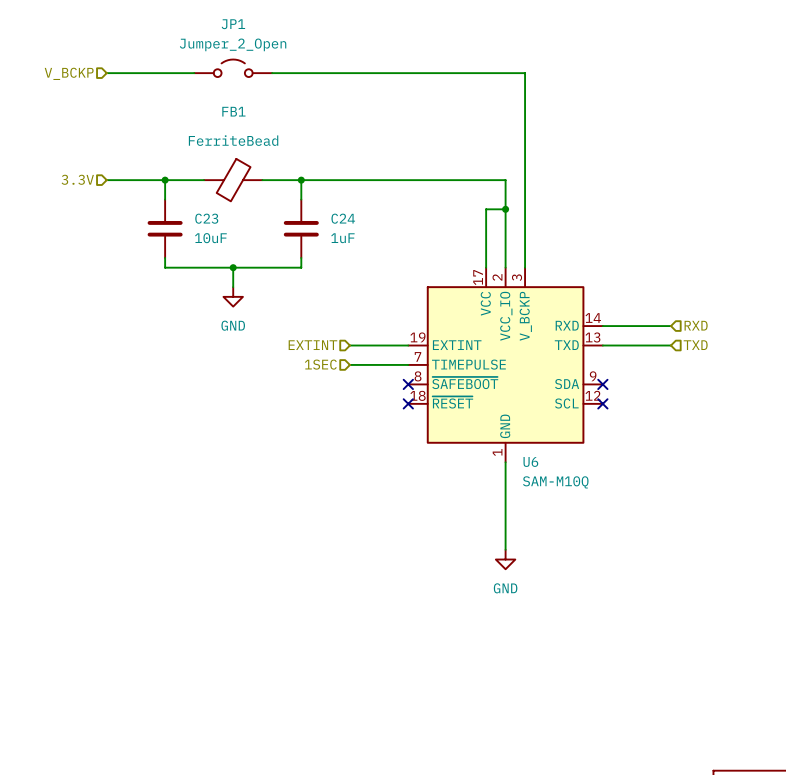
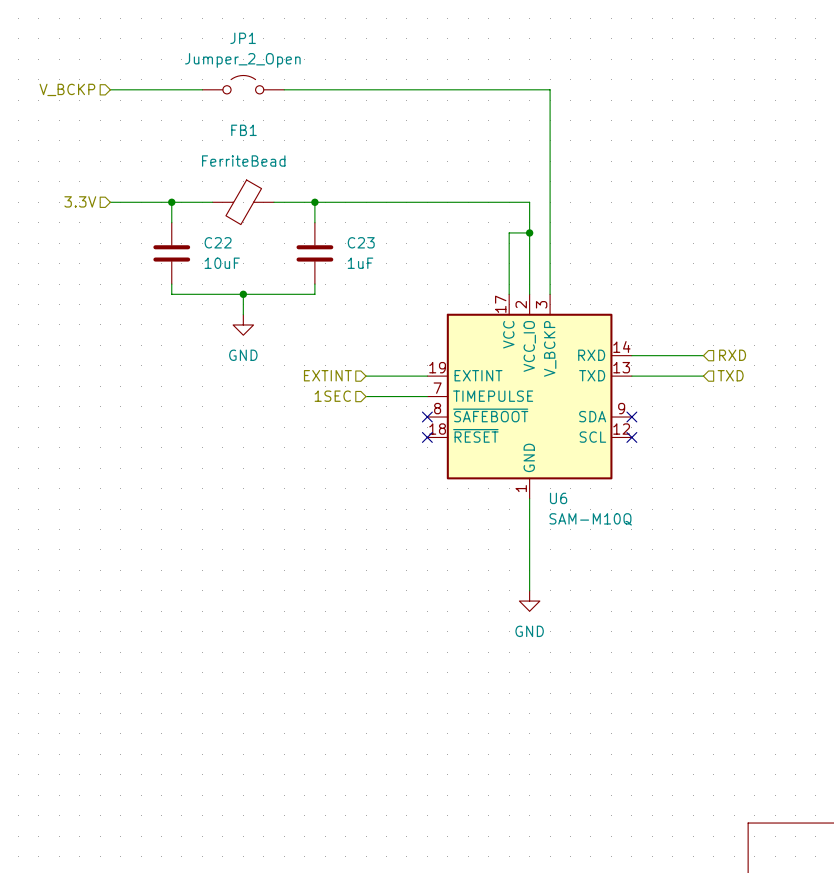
C23 name: C23 (206, 218) -> C22 (218, 242)
C24 name: C24 (343, 218) -> C23 (361, 242)

